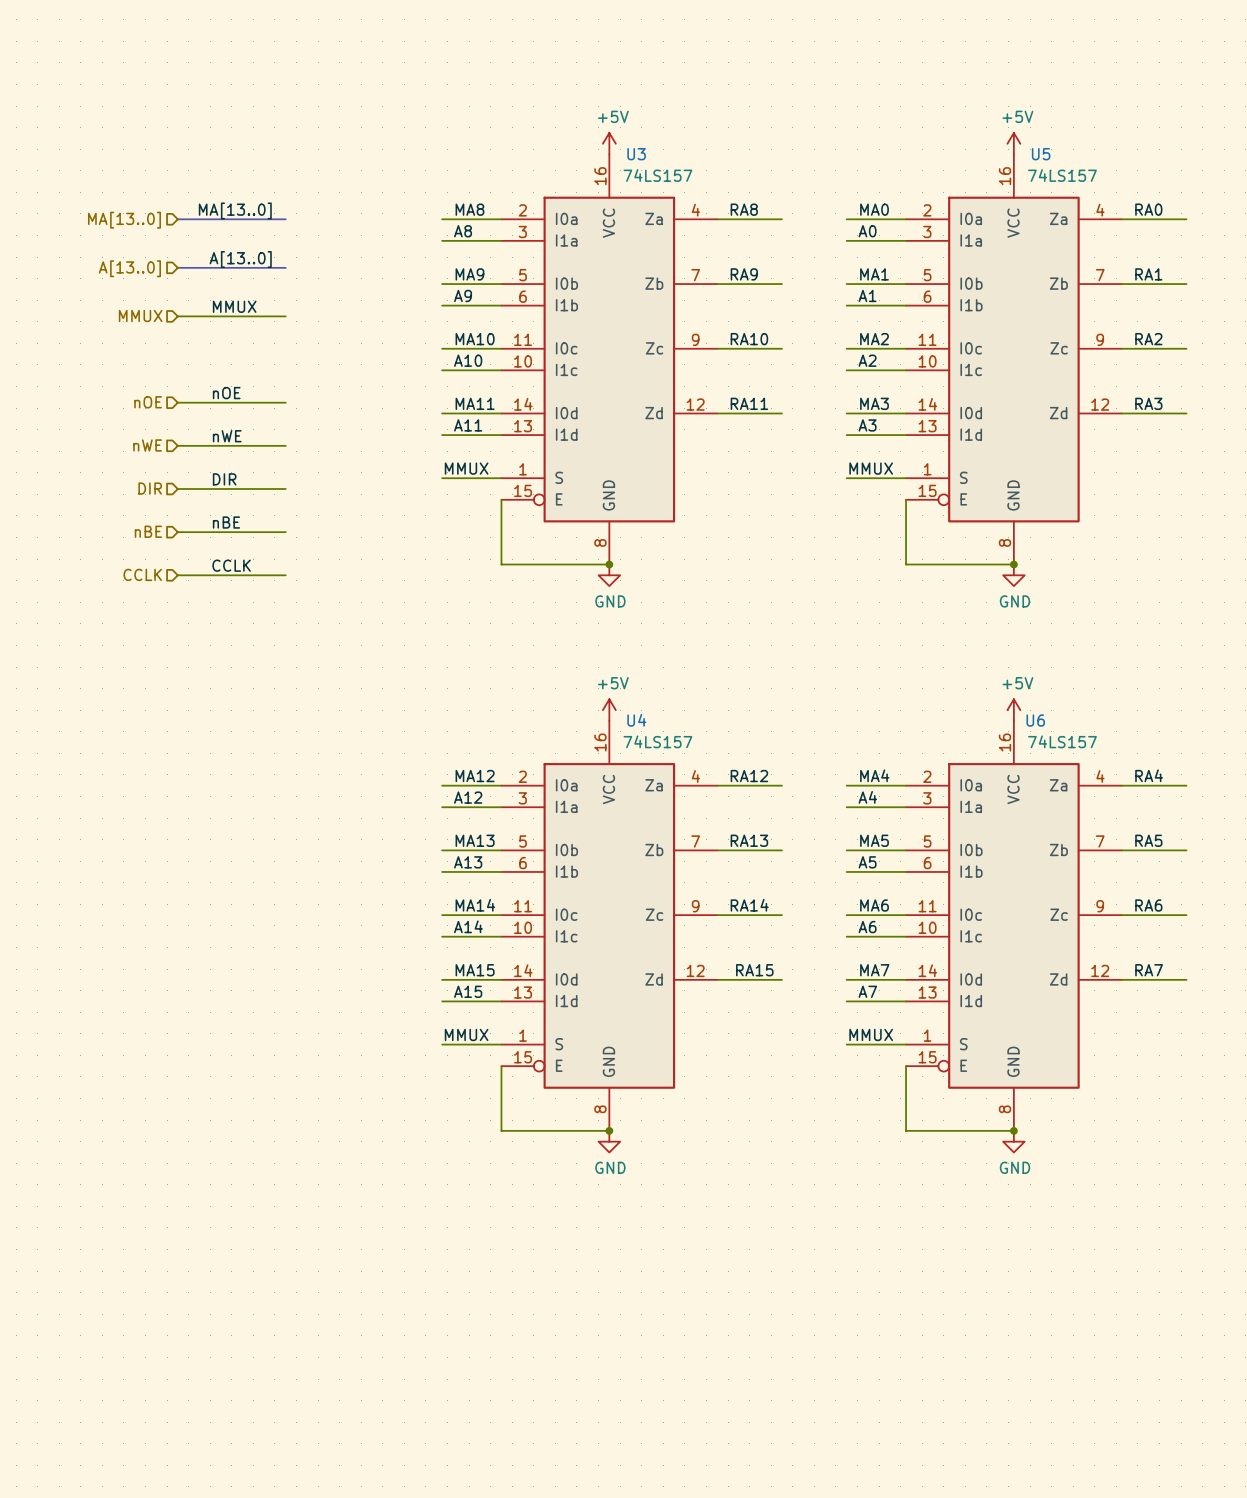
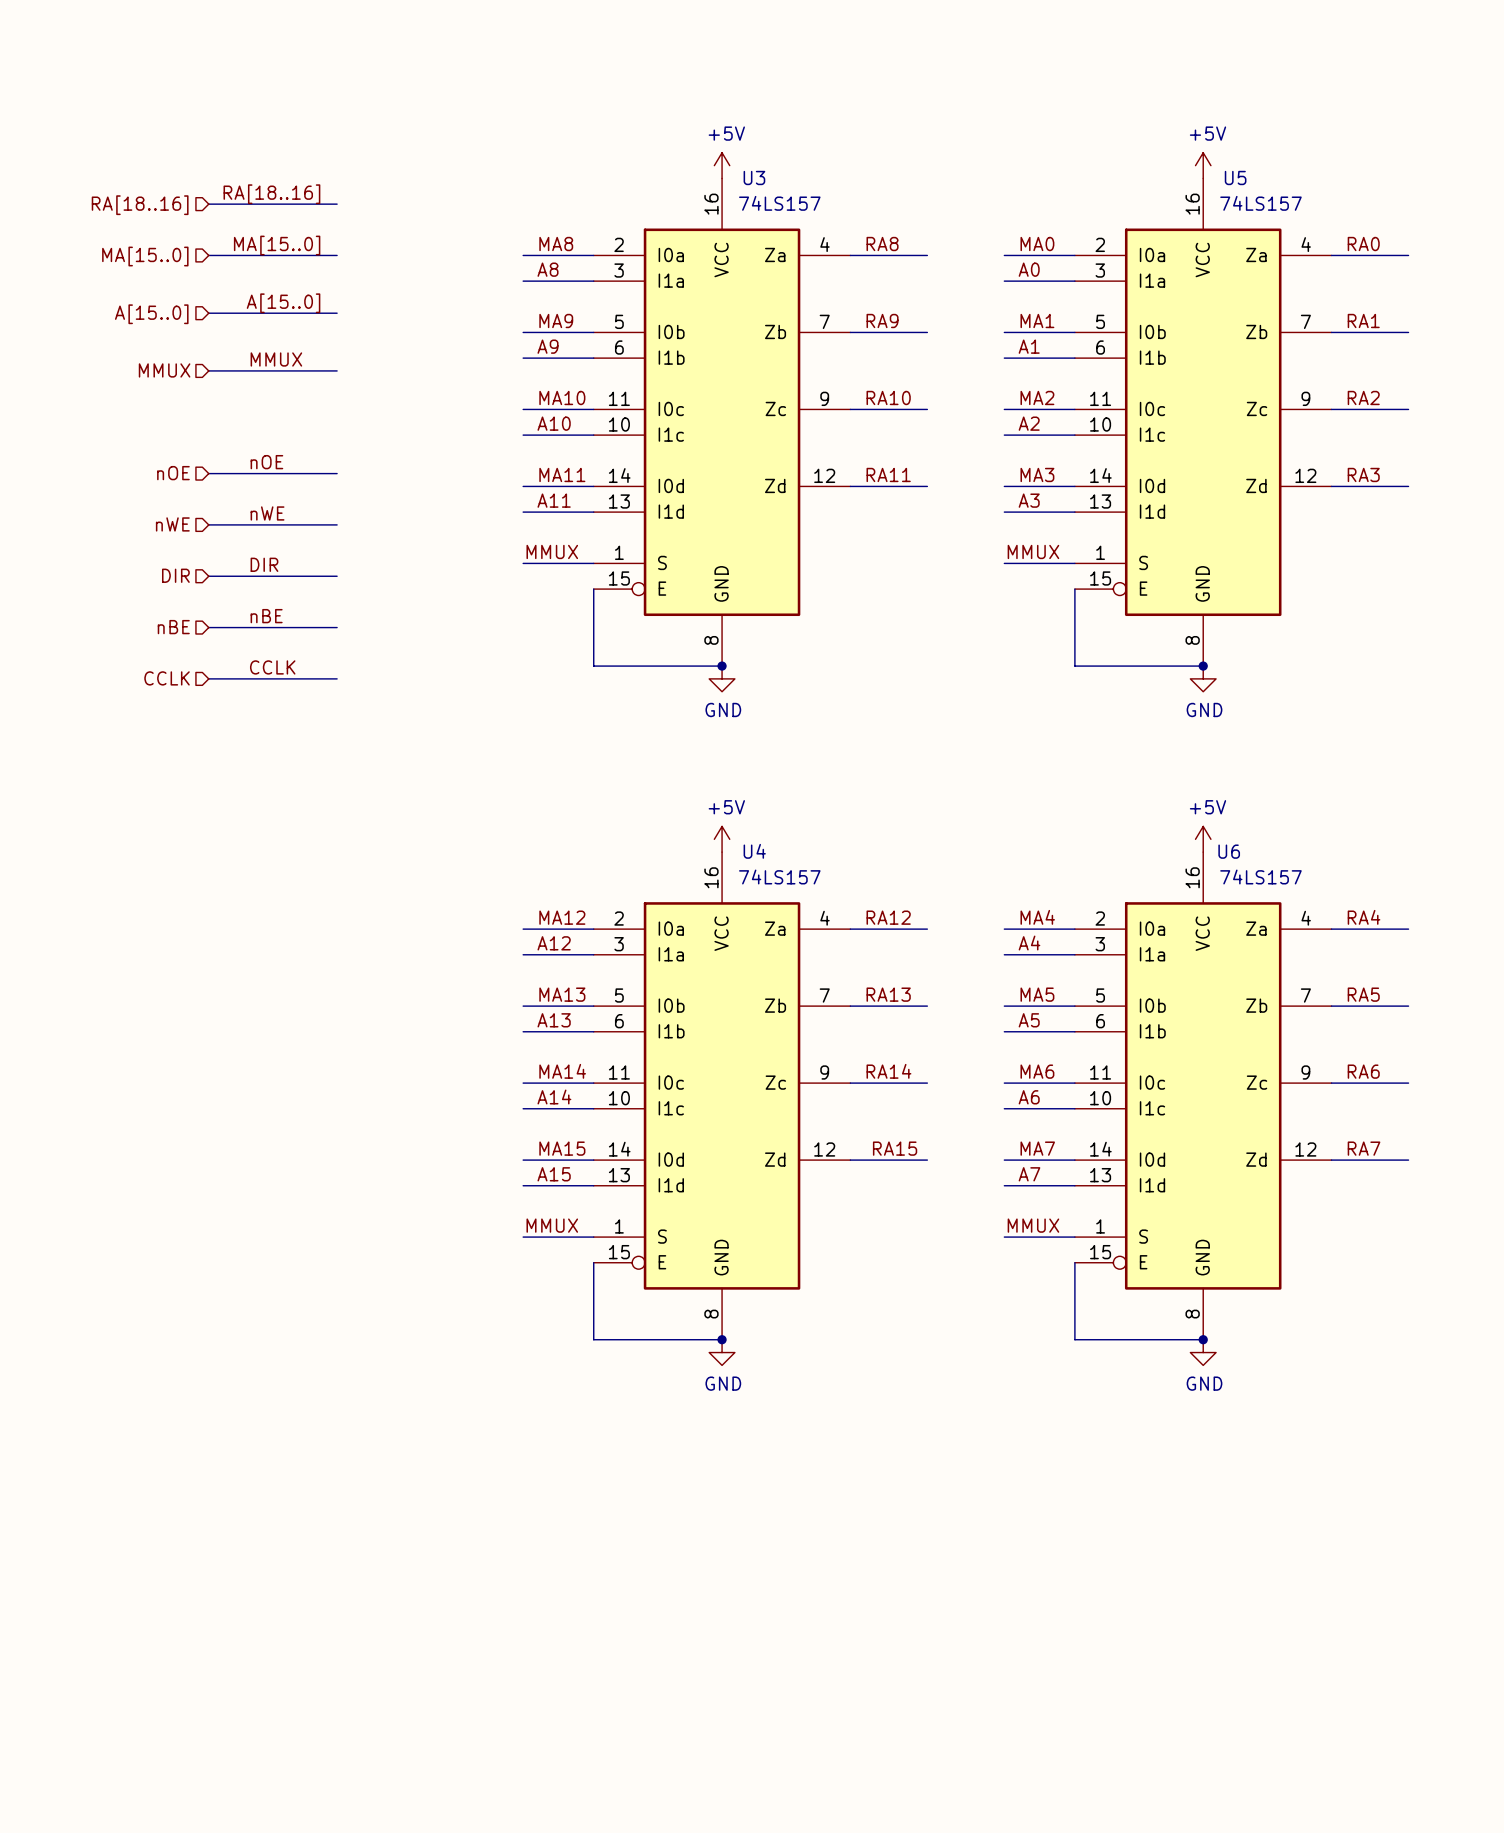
label: none -> RA[18..16] (271, 194)
bus: none -> (208, 204) (337, 204)
hierarchical label: none -> RA[18..16] (140, 205)
label: MA[13..0] (235, 210) -> MA[15..0] (277, 245)
hierarchical label: MA[13..0] (124, 220) -> MA[15..0] (145, 256)
label: A[13..0] (240, 259) -> A[15..0] (283, 303)
hierarchical label: A[13..0] (129, 268) -> A[15..0] (151, 314)

